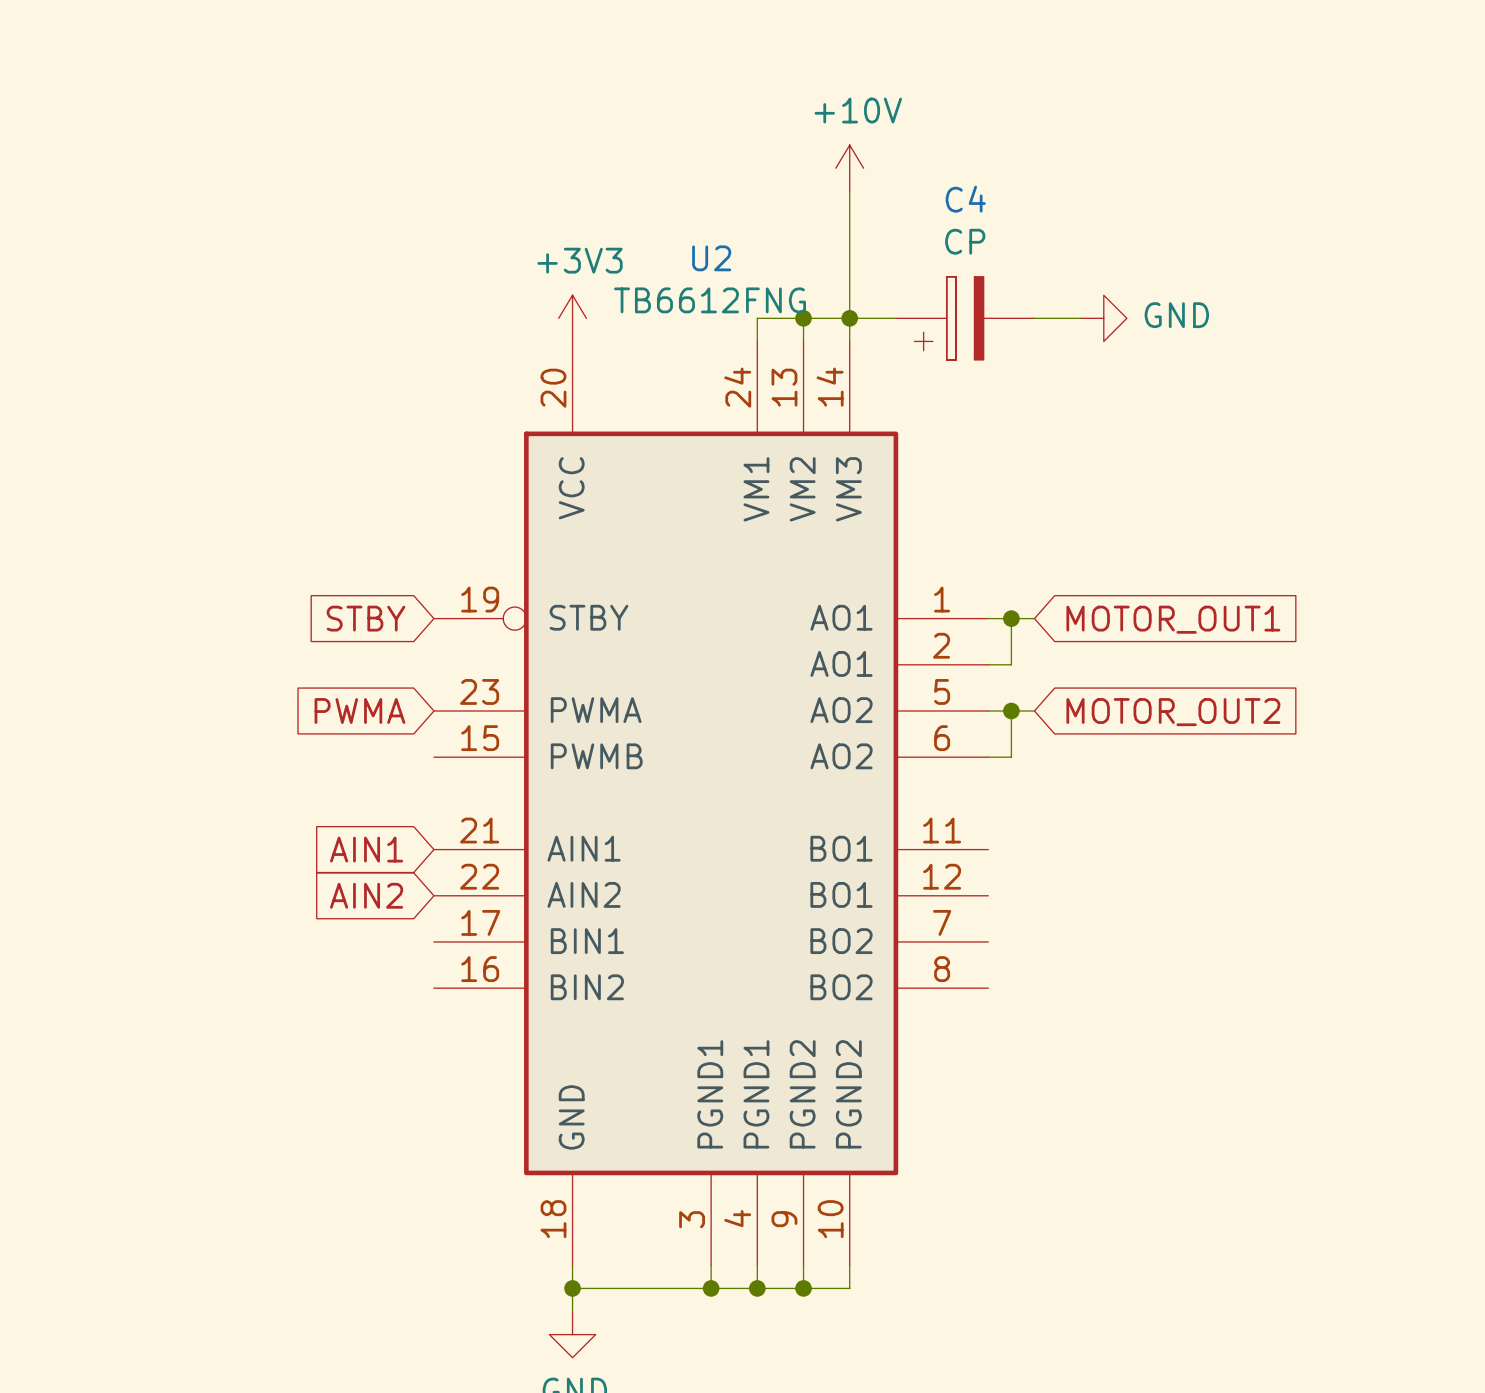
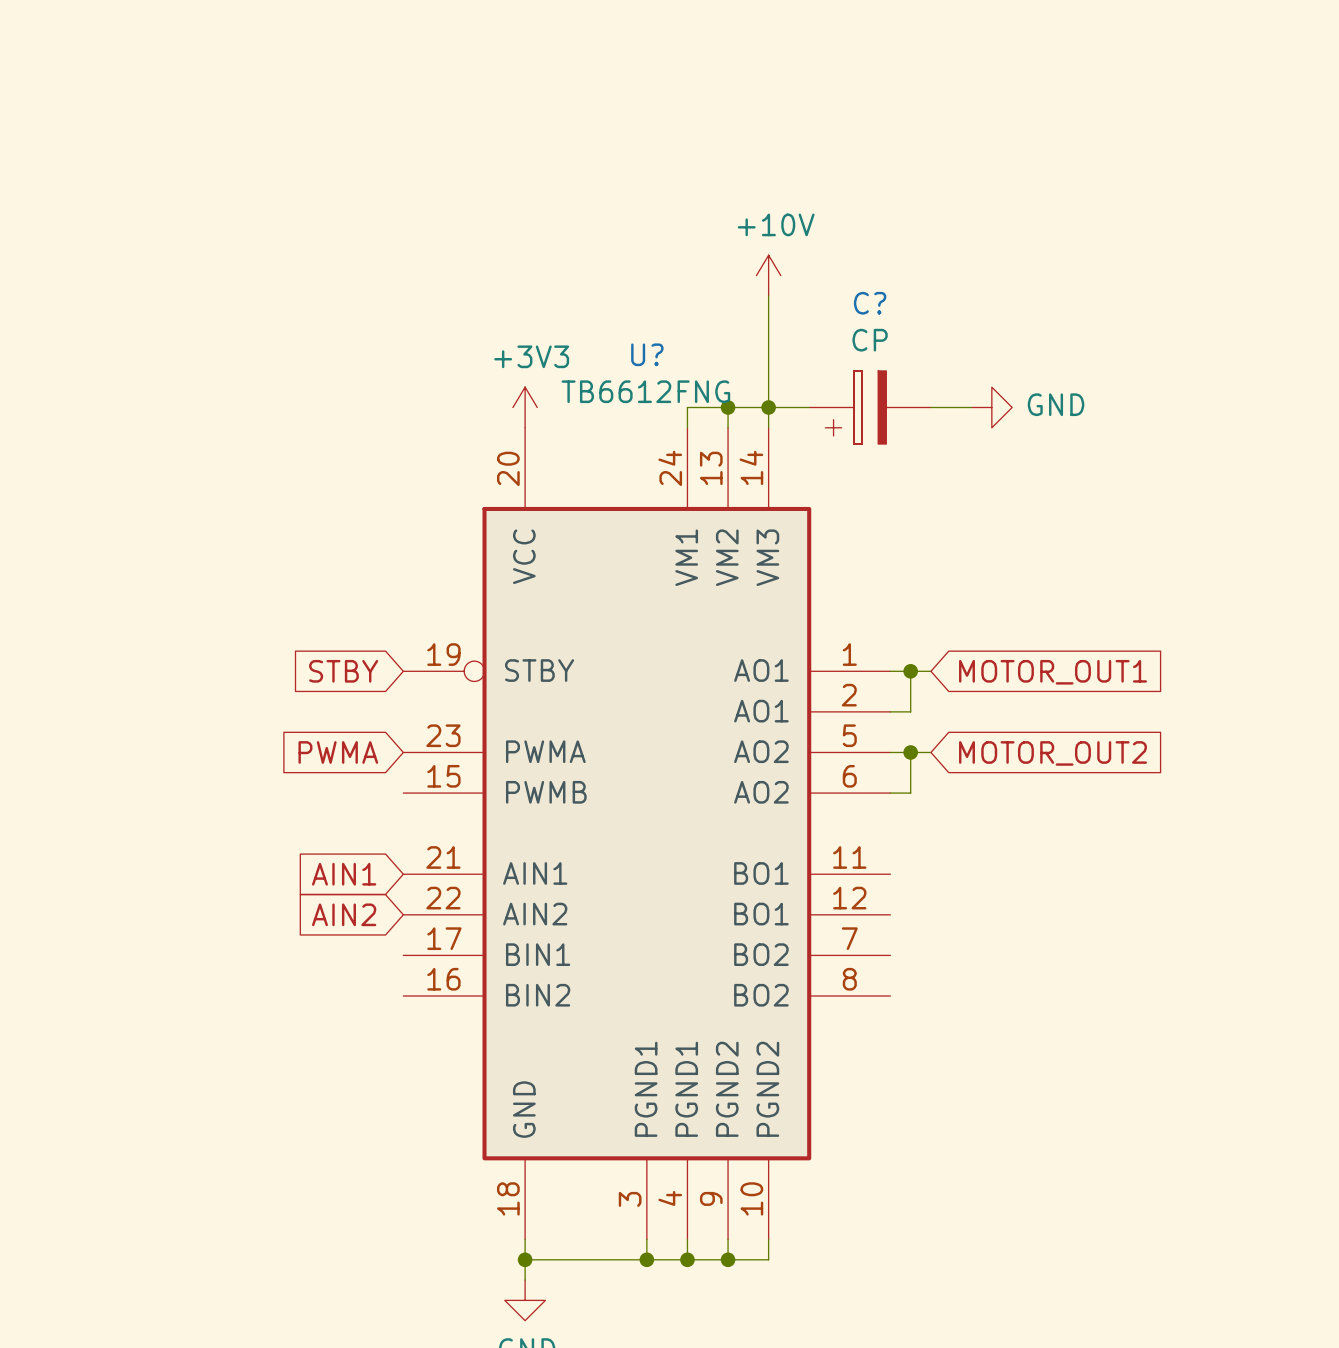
C4 name: C4 (965, 199) -> C? (870, 303)
U2 name: U2 (711, 258) -> U? (647, 354)

